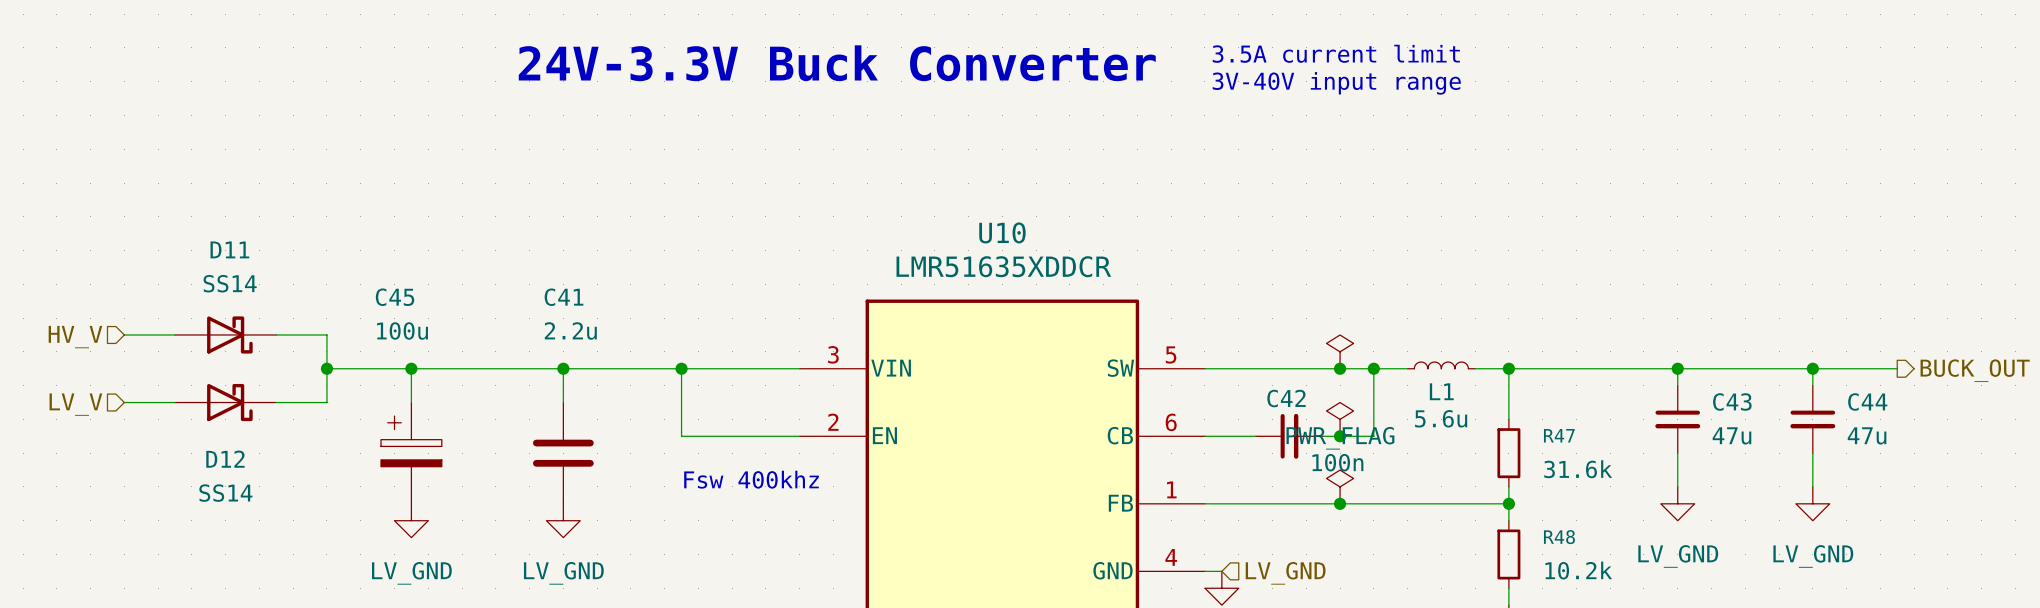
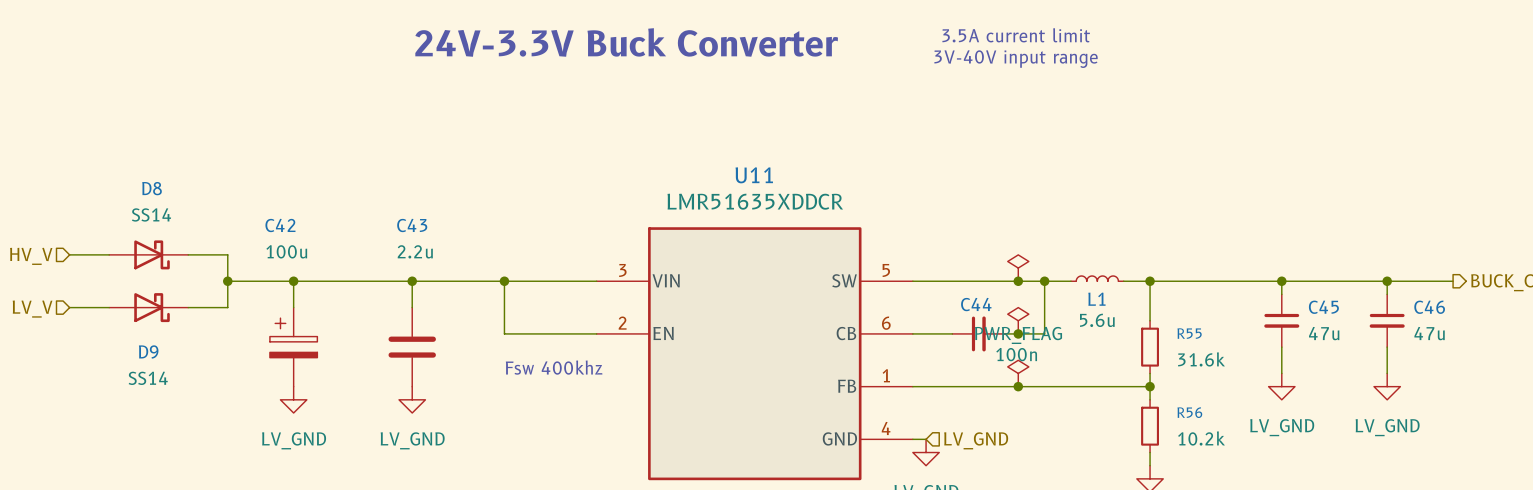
U10 name: U10 (1002, 232) -> U11 (754, 175)
D11 name: D11 (229, 249) -> D8 (152, 188)
C45 name: C45 (395, 297) -> C42 (280, 225)
C41 name: C41 (564, 297) -> C43 (412, 225)
C42 name: C42 (1286, 398) -> C44 (976, 304)
C43 name: C43 (1732, 401) -> C45 (1323, 307)
C44 name: C44 (1867, 401) -> C46 (1429, 307)
R47 name: R47 (1559, 435) -> R55 (1189, 333)
D12 name: D12 (225, 459) -> D9 (148, 351)
R48 name: R48 (1559, 537) -> R56 (1189, 412)

